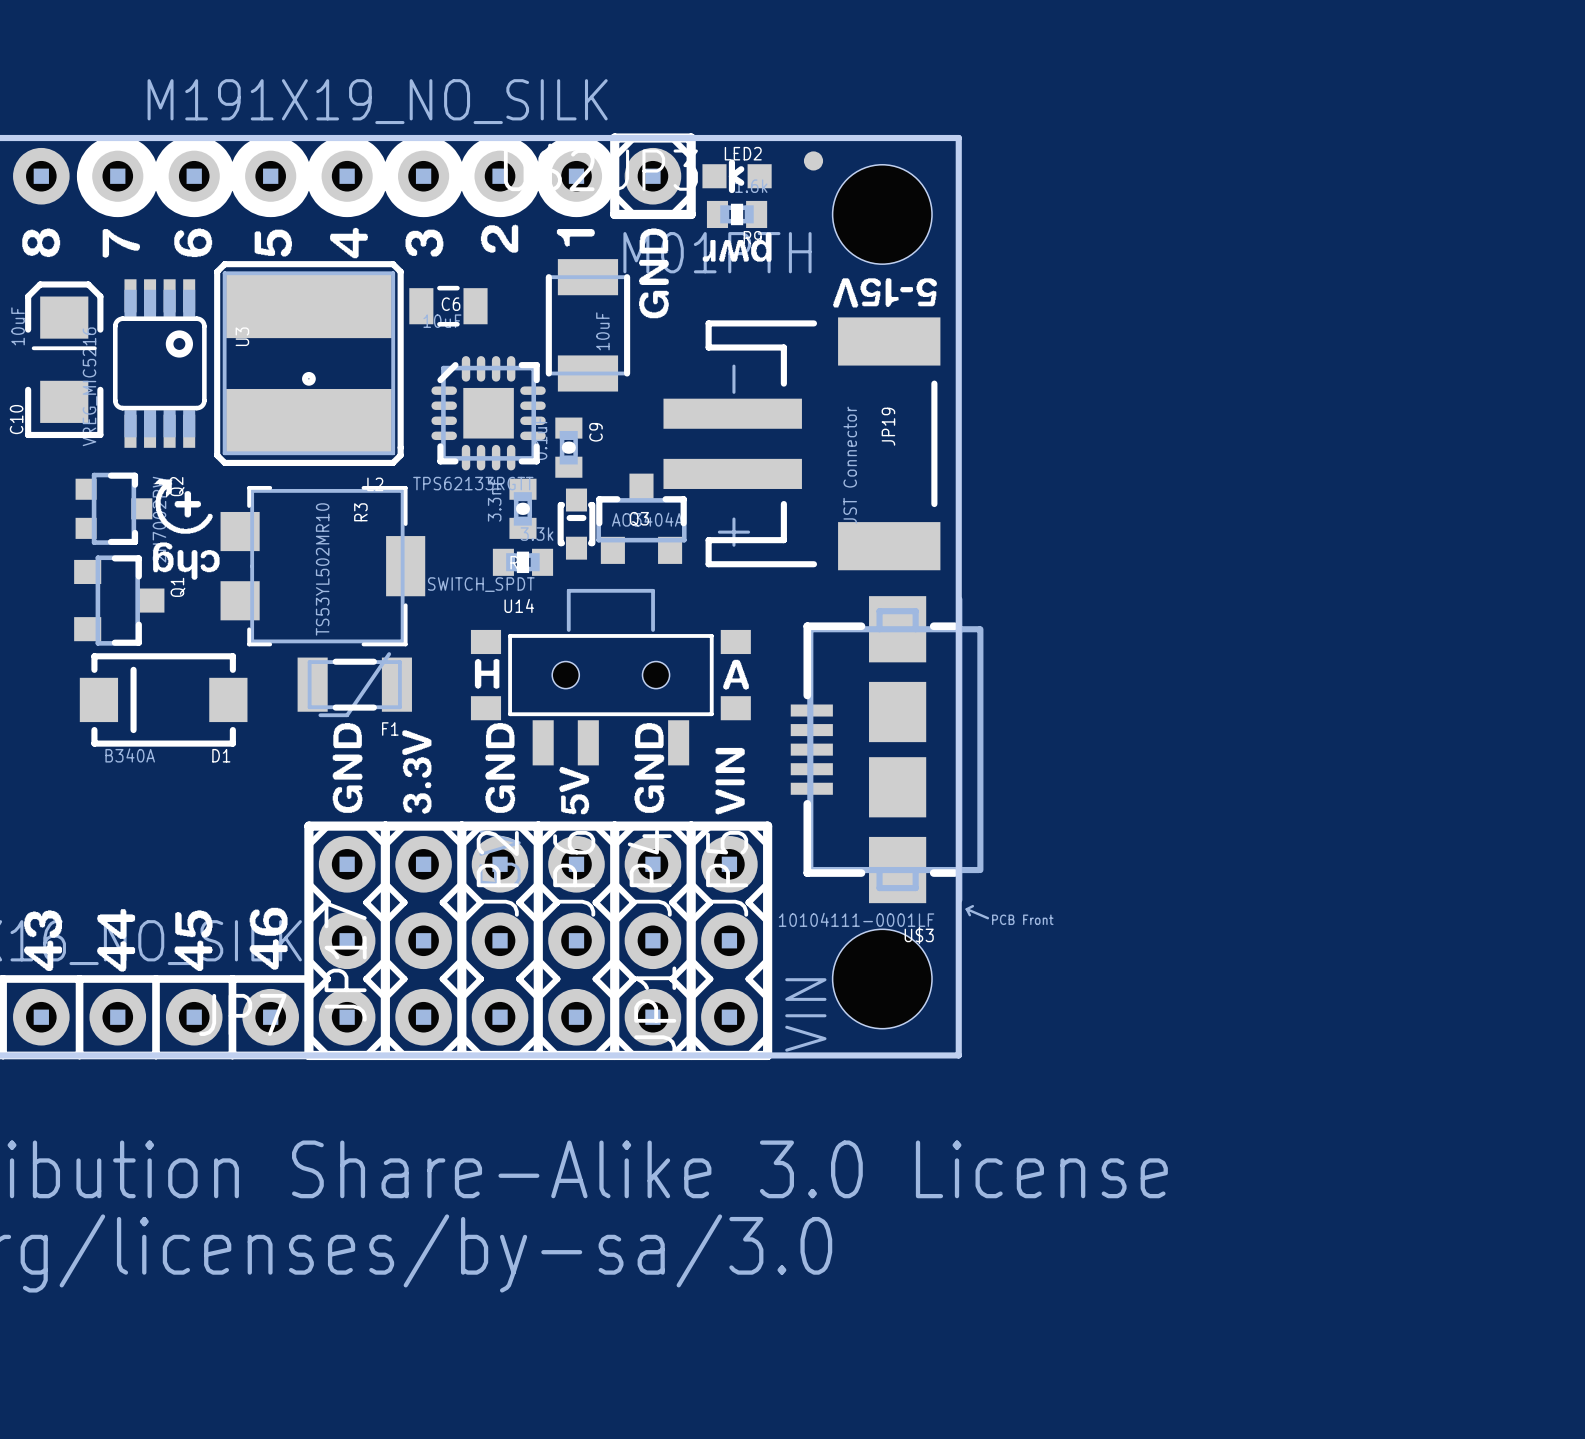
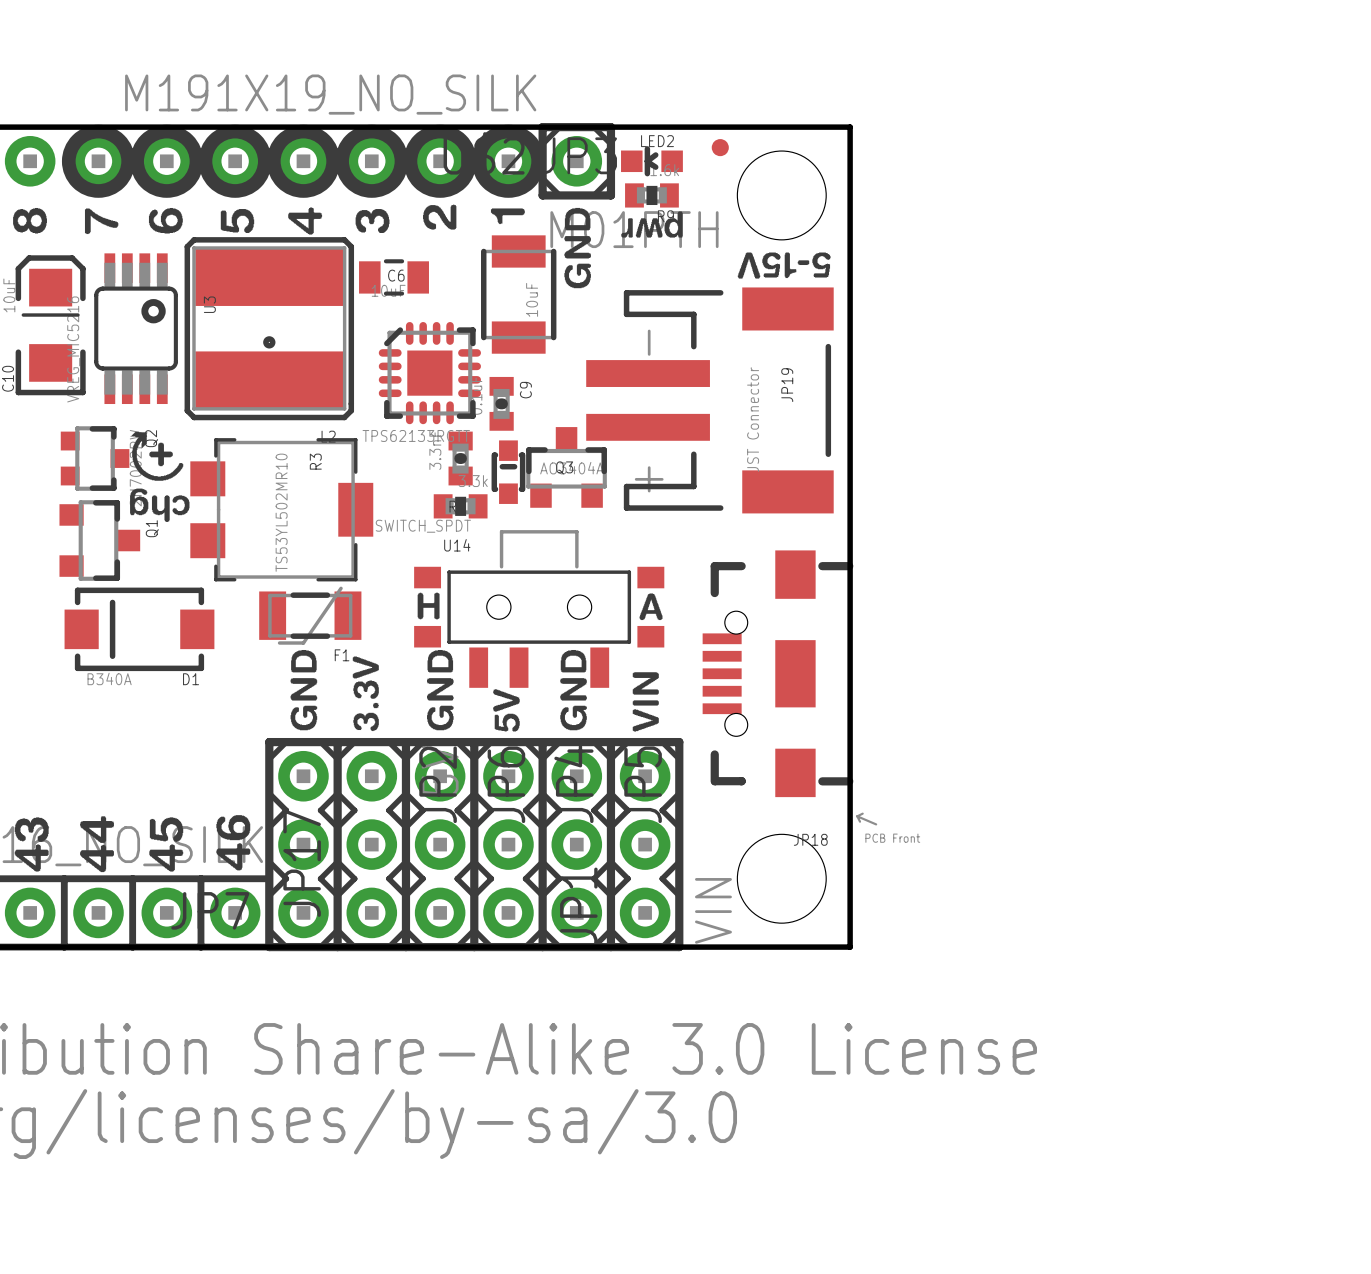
U$3: 10104111-0001LF (889, 757) -> none
JP18: none -> (789, 706)

